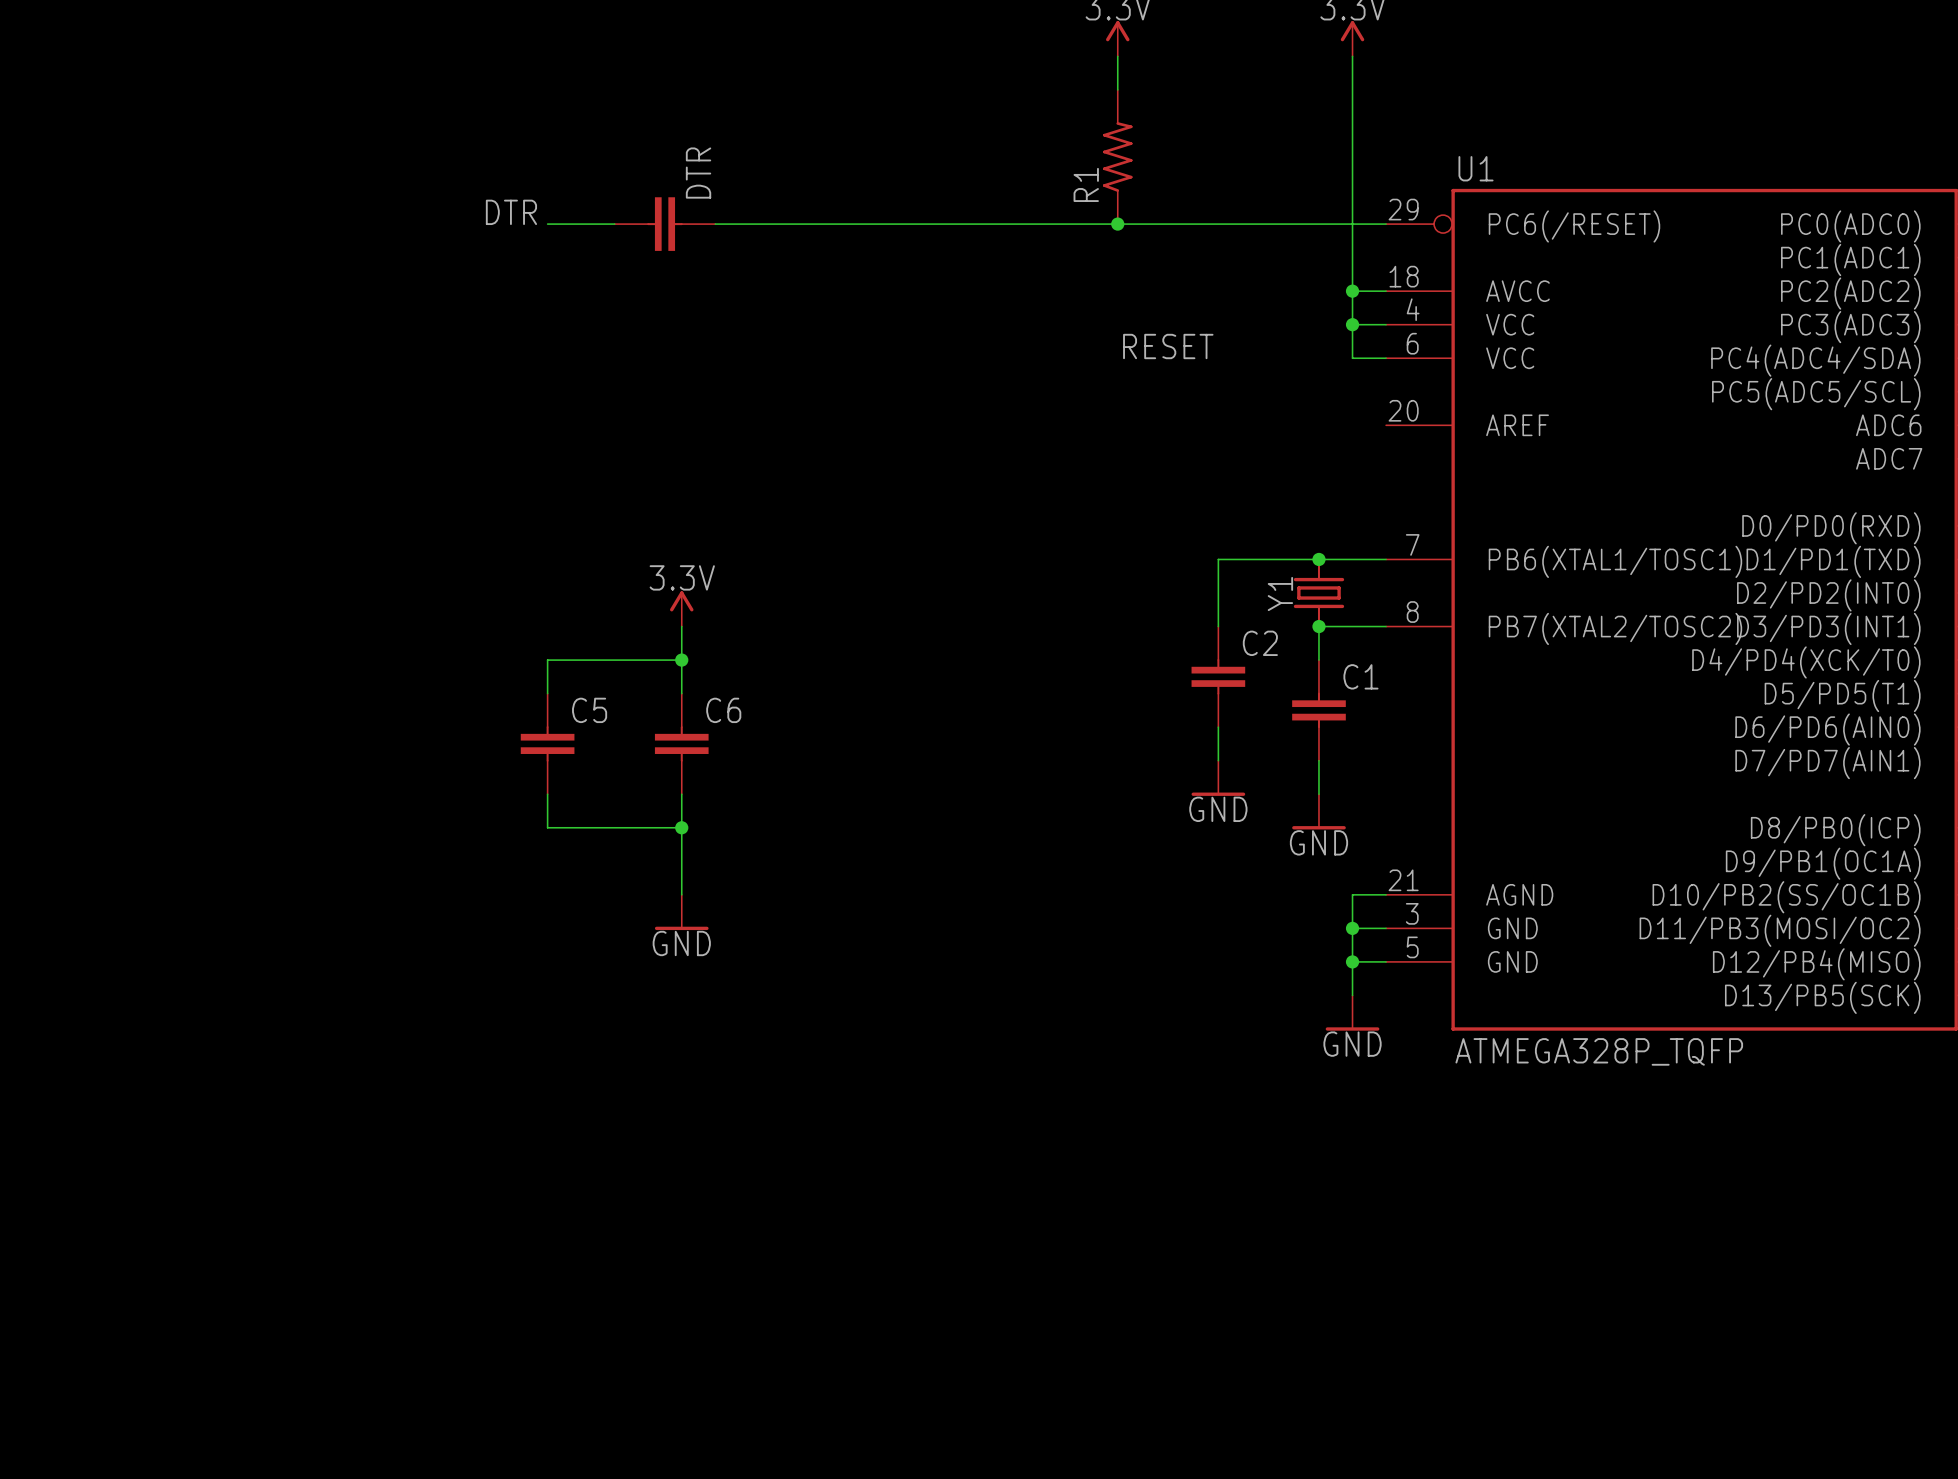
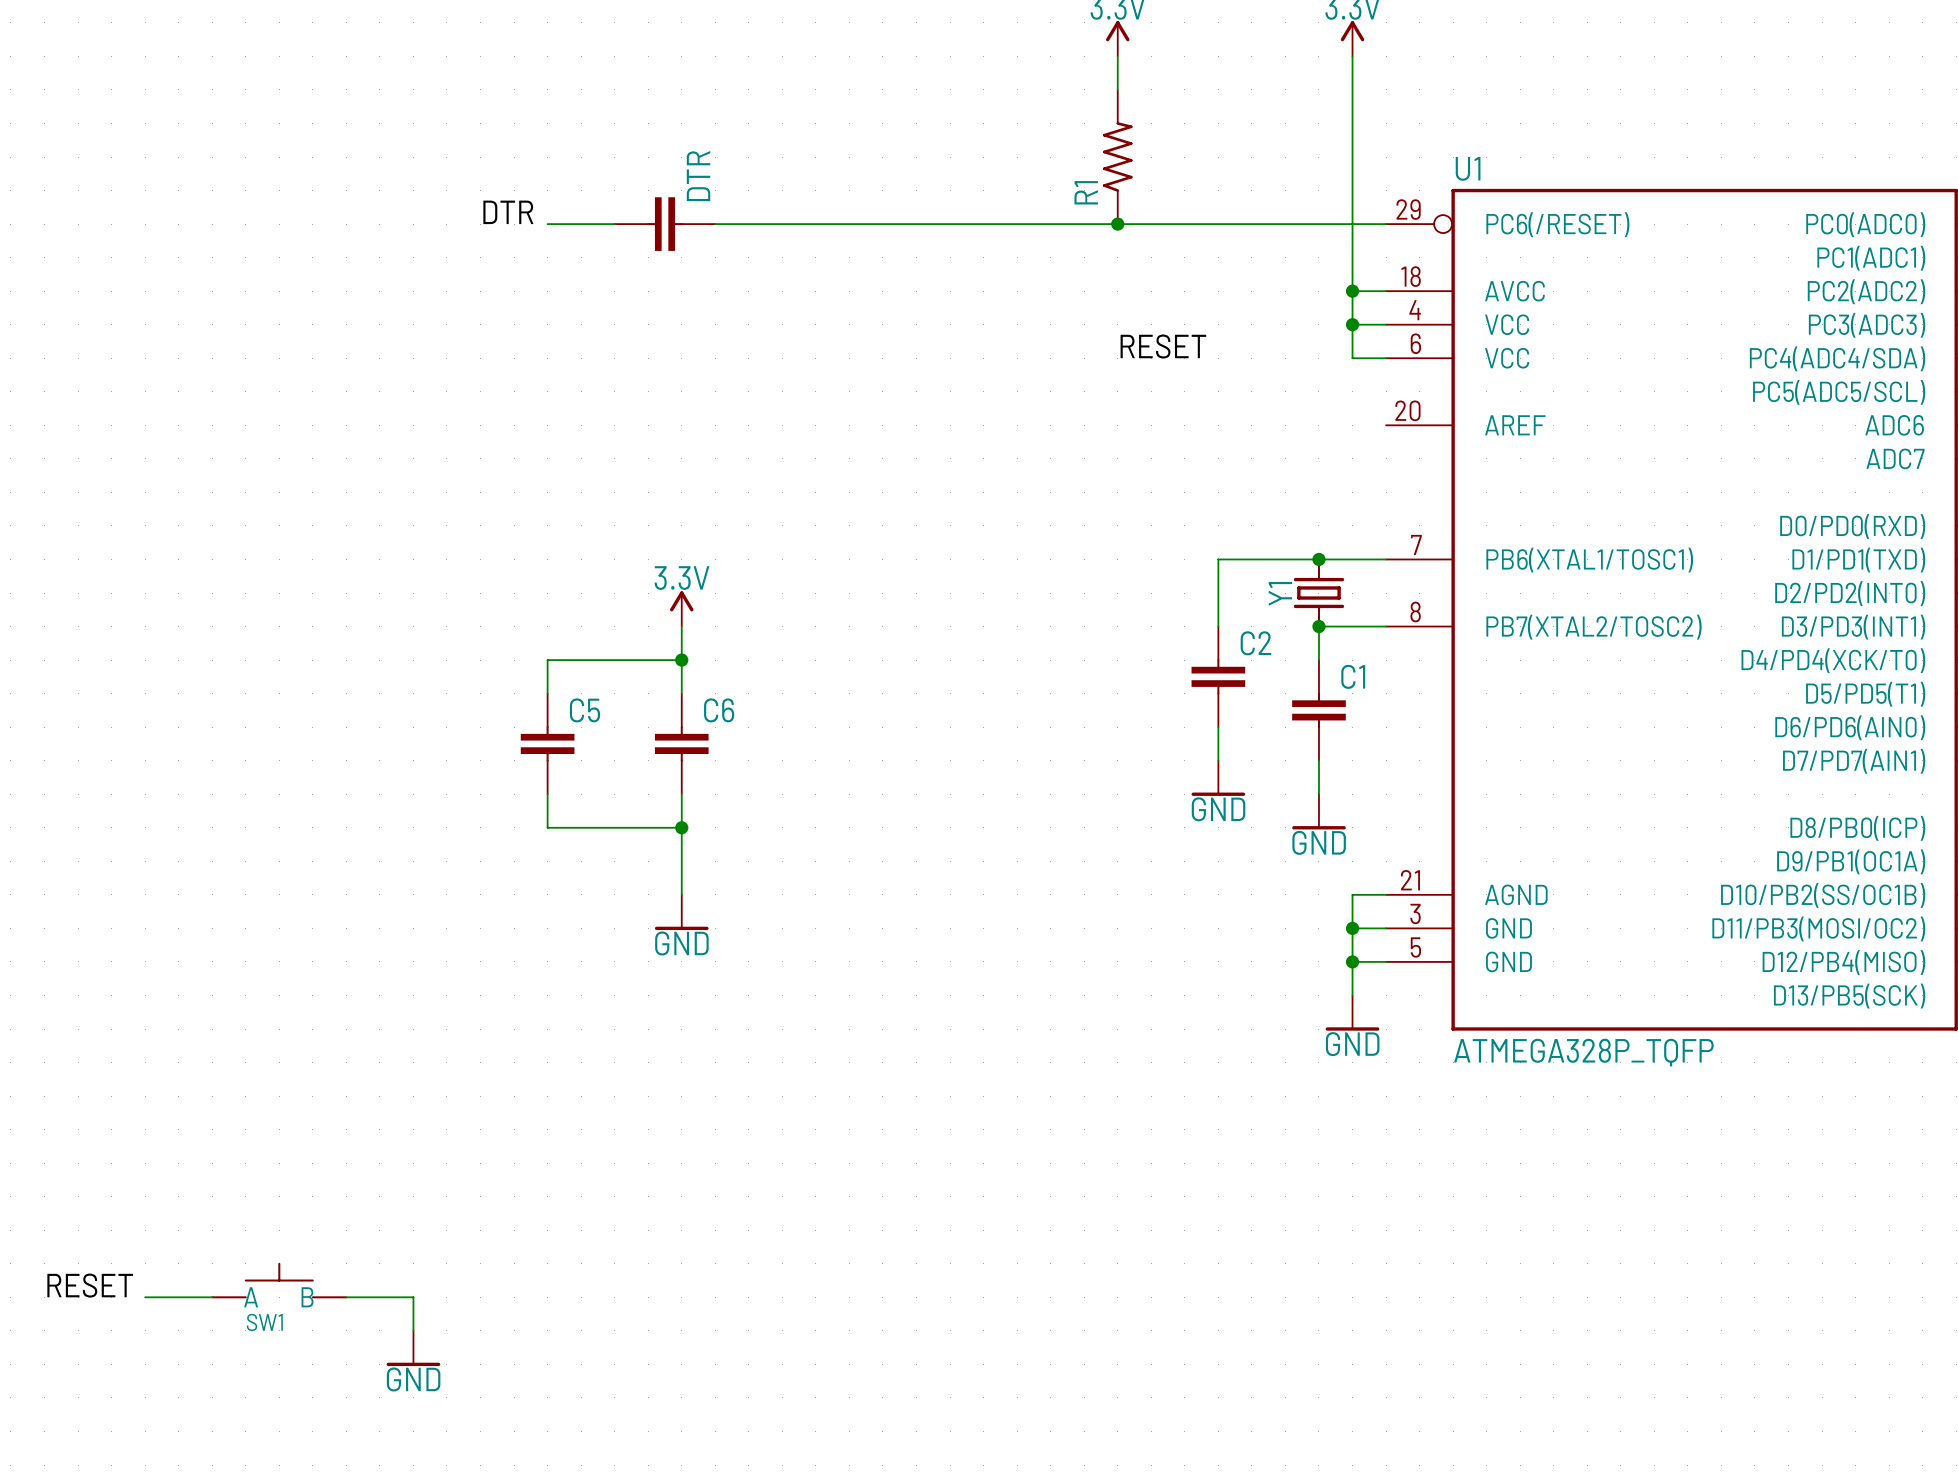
SW1: none -> (279, 1280)
label: none -> RESET (90, 1285)
wire: none -> (145, 1297) (212, 1297)
wire: none -> (346, 1297) (413, 1297) (413, 1330)
power symbol: none -> GND (413, 1348)

